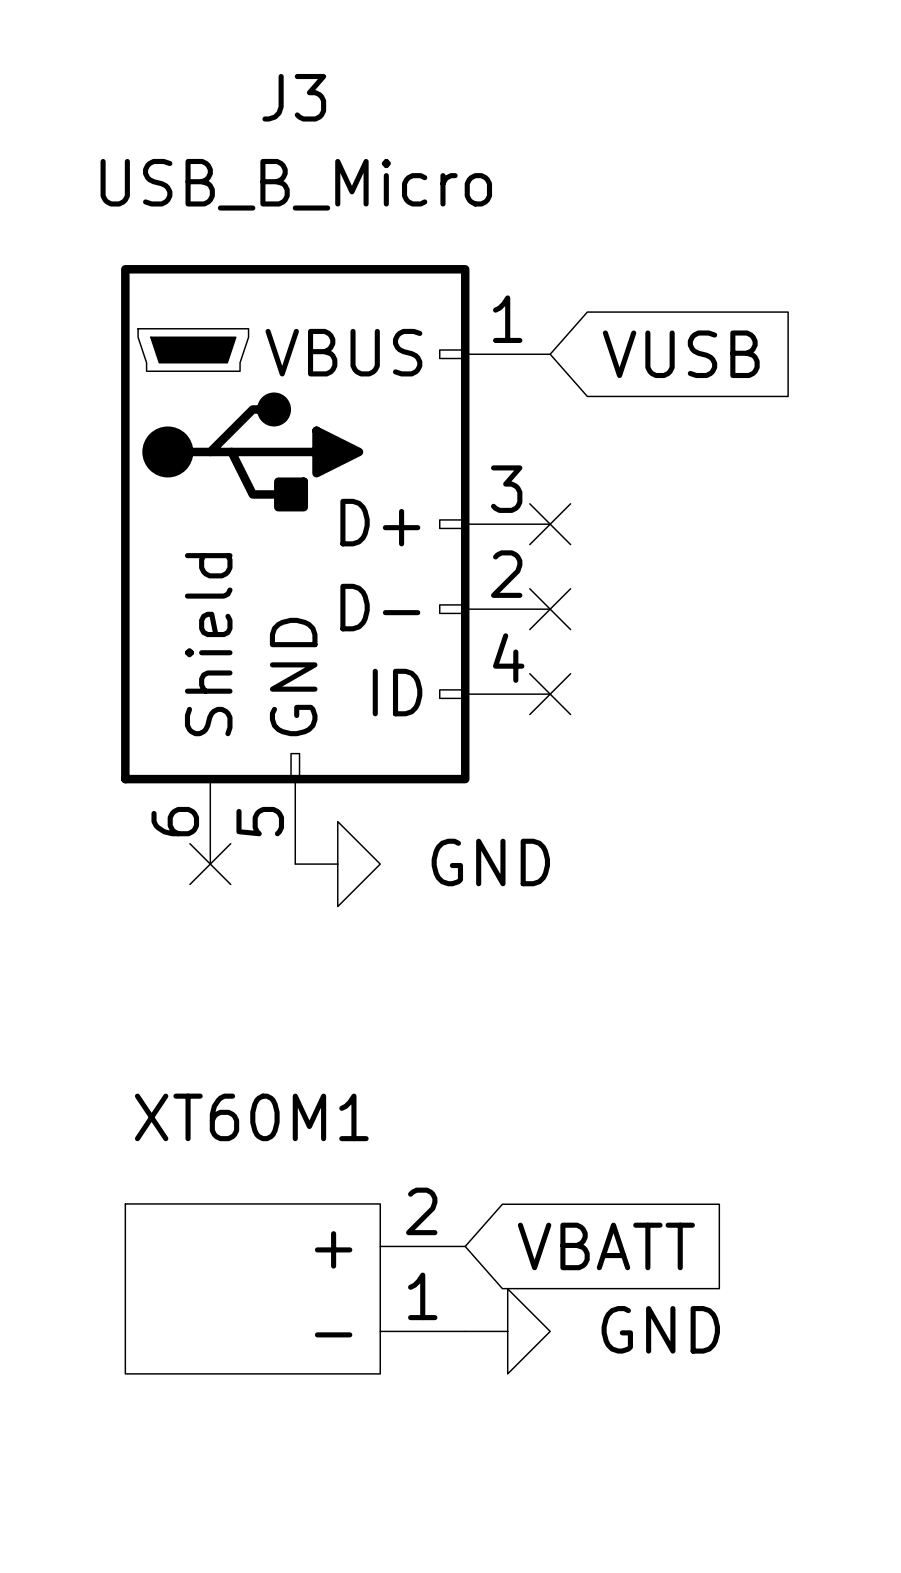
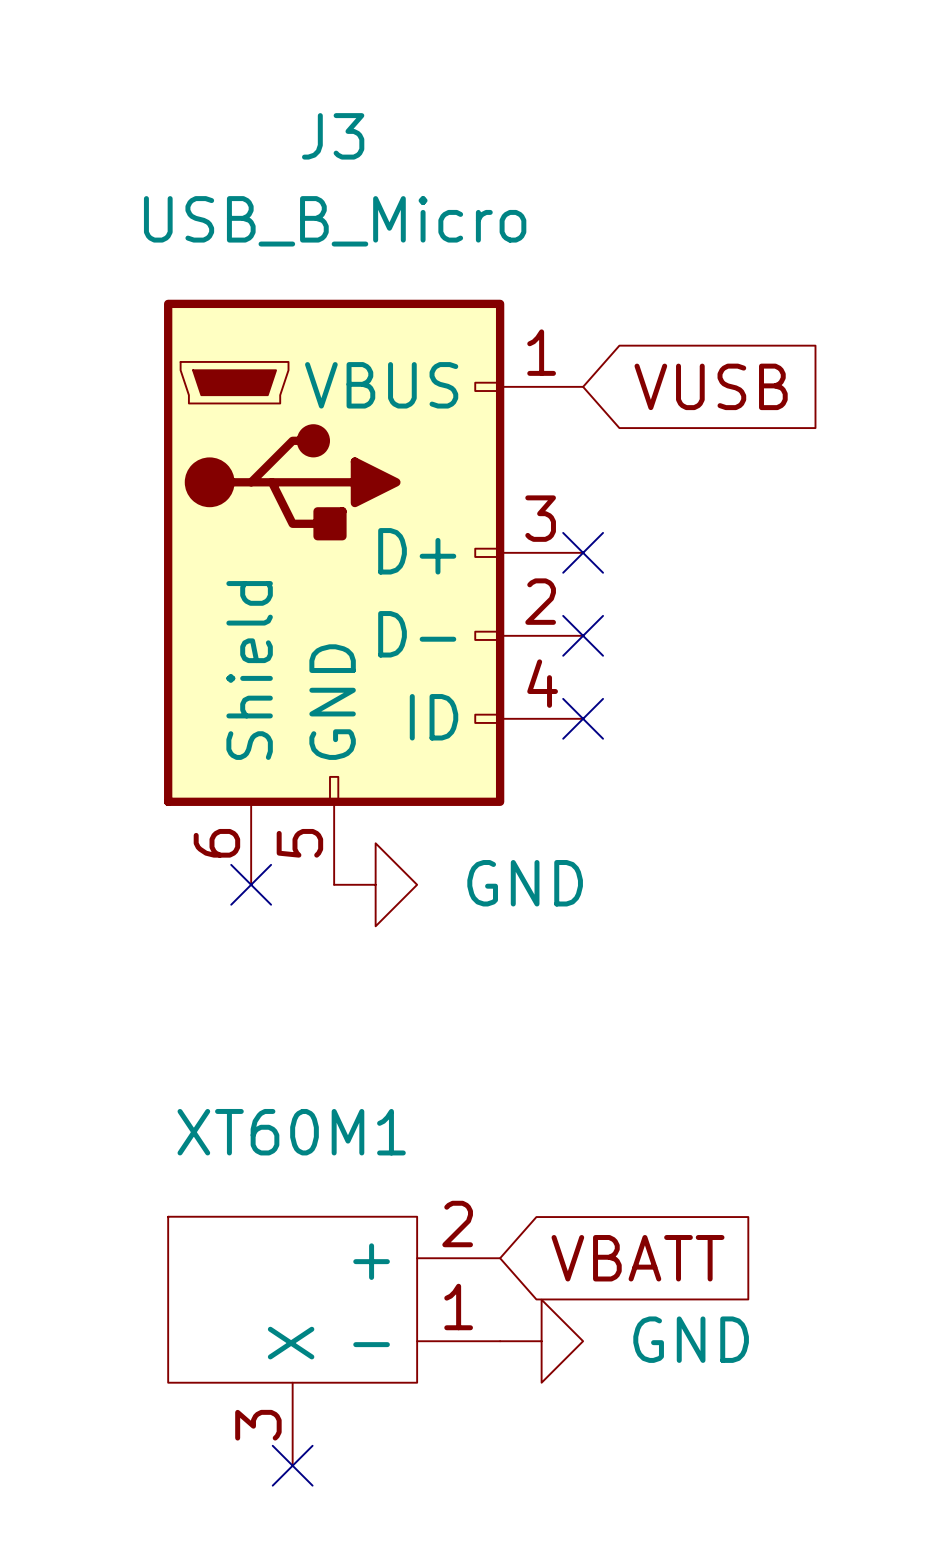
XT60M1 symbol: [125, 1203, 466, 1374] -> [168, 1216, 501, 1466]
no-connect mark: none -> (292, 1465)

